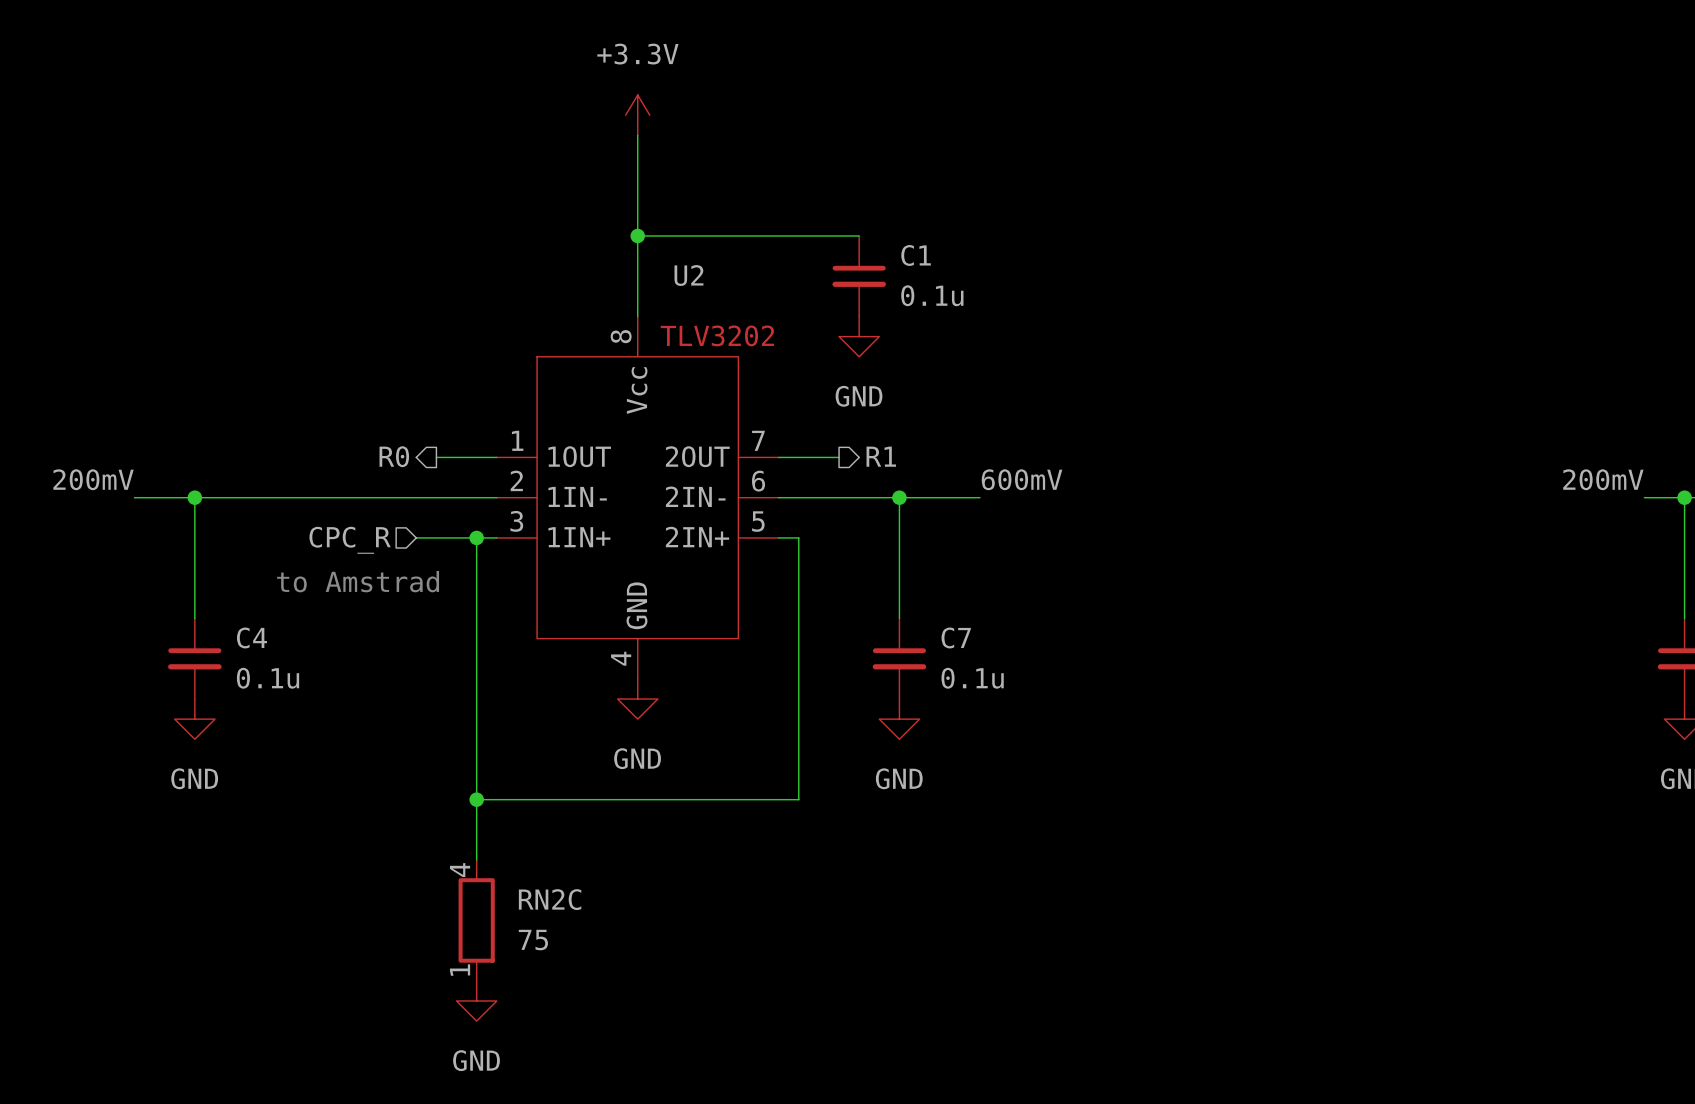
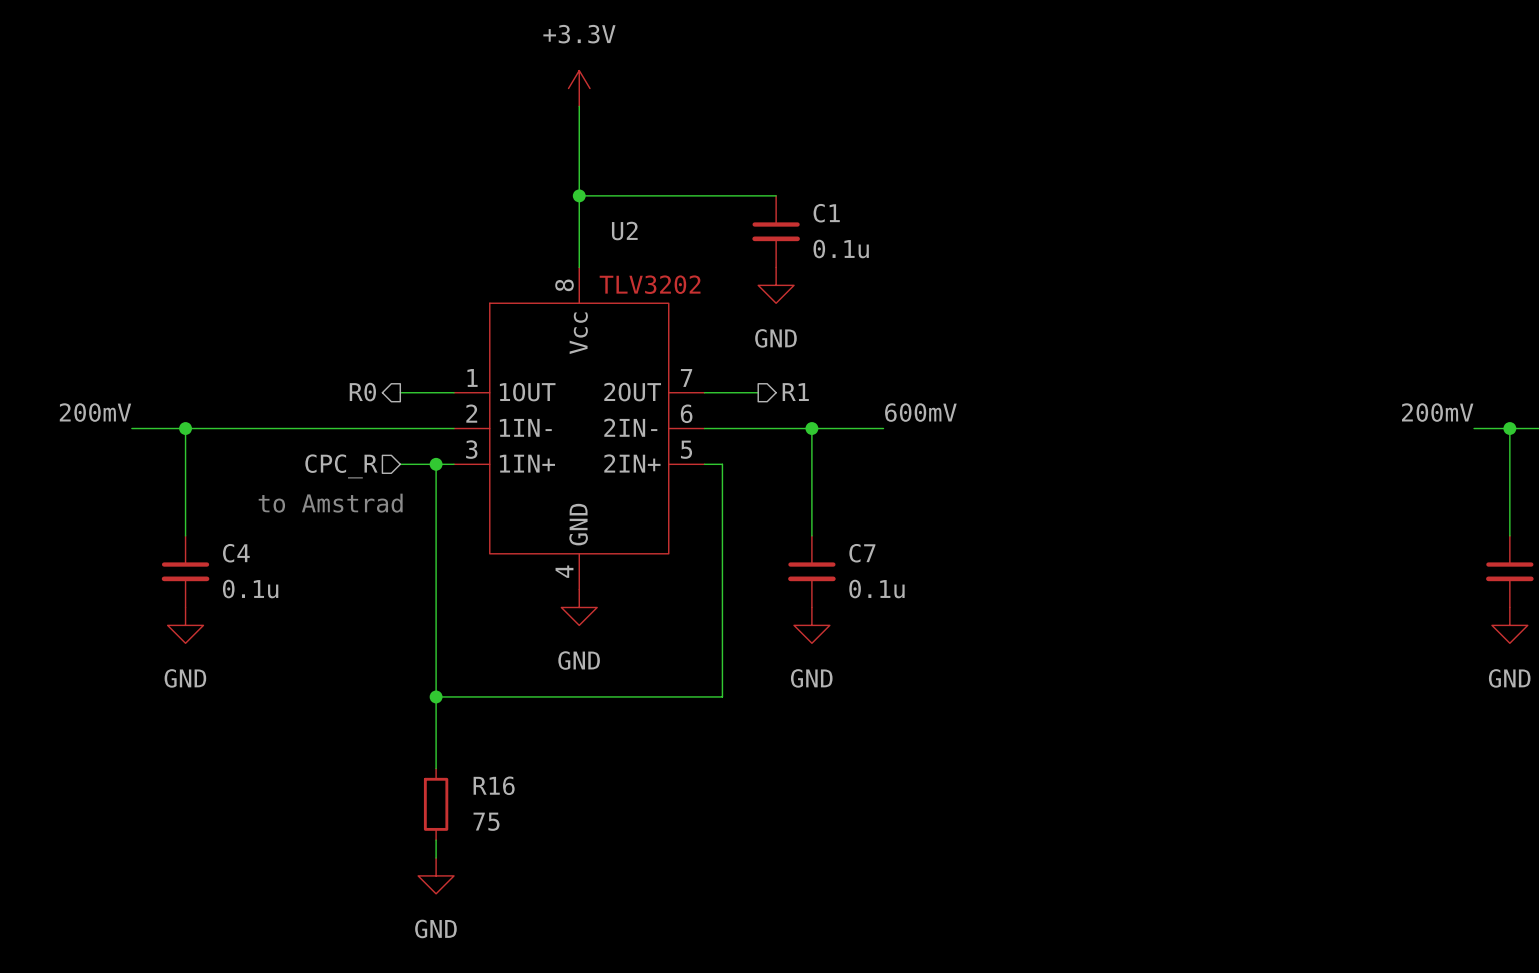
wire: (416, 537) (436, 537) -> none
hierarchical label position: CPC_R (350, 540) -> CPC_R (341, 466)
RN2C: 75 (476, 920) -> none
R16: none -> 75 (436, 804)

